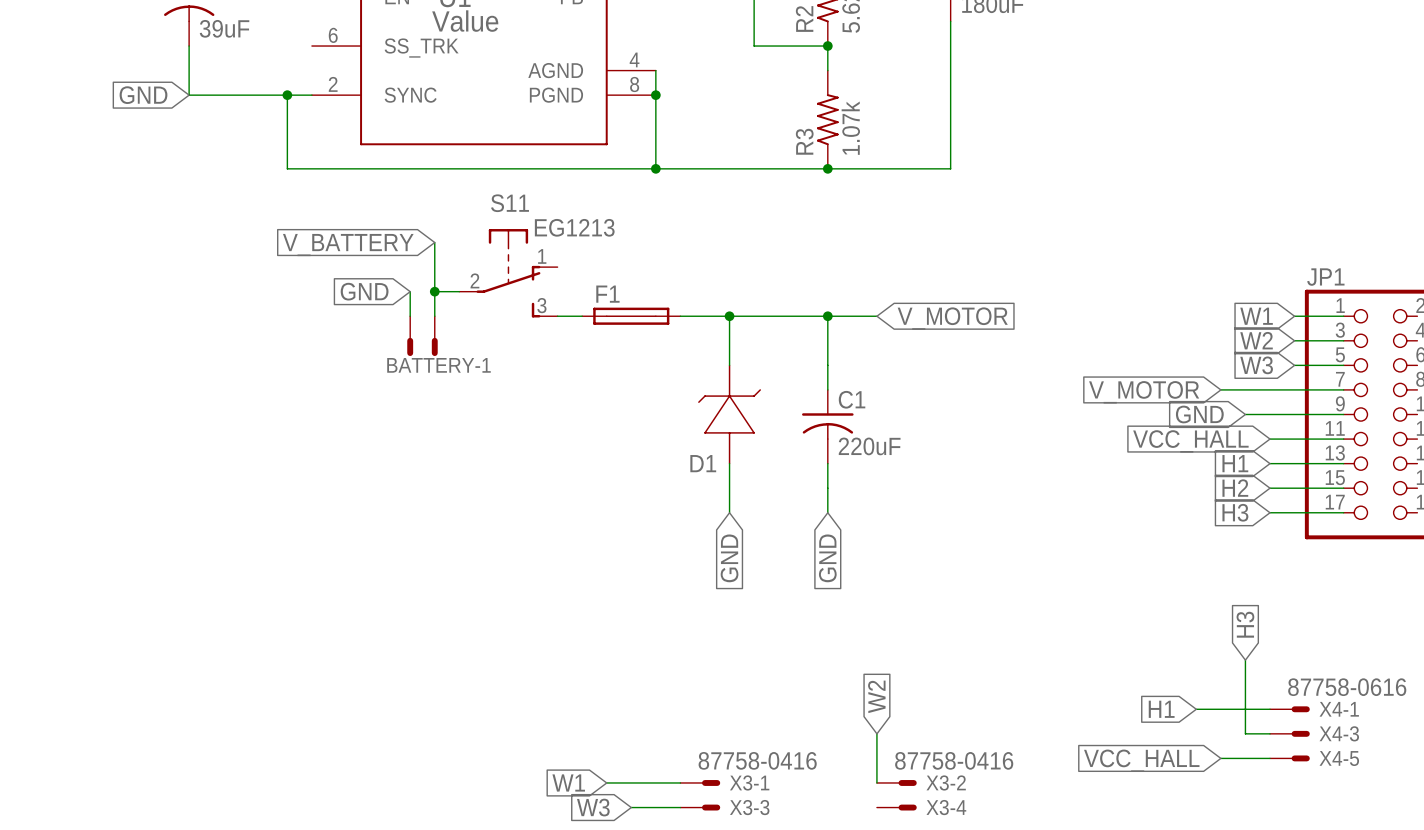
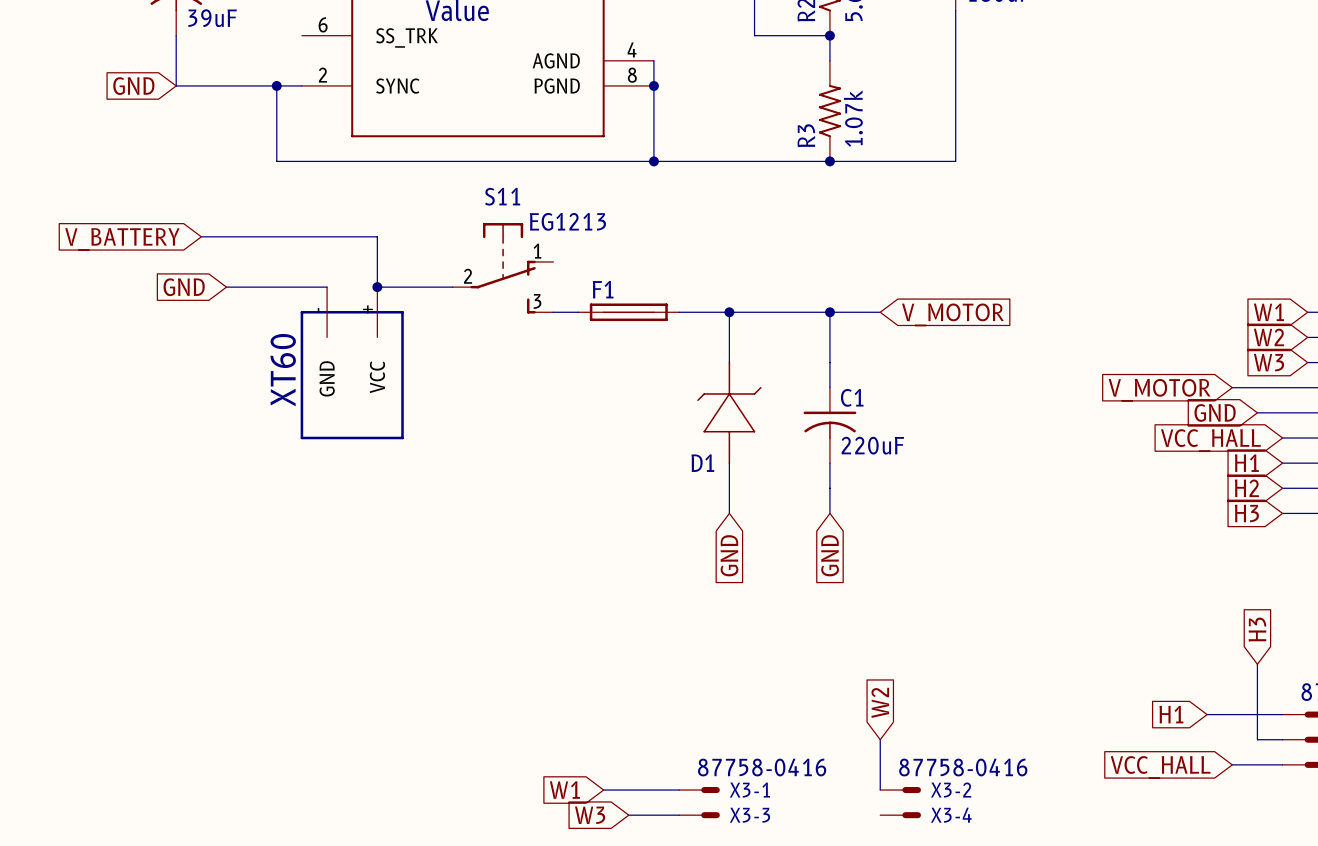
wire: none -> (201, 236) (377, 236) (377, 287) (427, 287)
wire: (434, 242) (434, 316) -> none
global label position: V_BATTERY (348, 245) -> V_BATTERY (122, 239)
wire: none -> (226, 287) (327, 287)
global label position: GND (364, 291) -> GND (184, 287)
wire: (410, 291) (410, 316) -> none
junction position: (434, 291) -> (377, 287)
part: (410, 336) -> none
BATTERY-1: (434, 336) -> none
part: none -> (352, 363)

